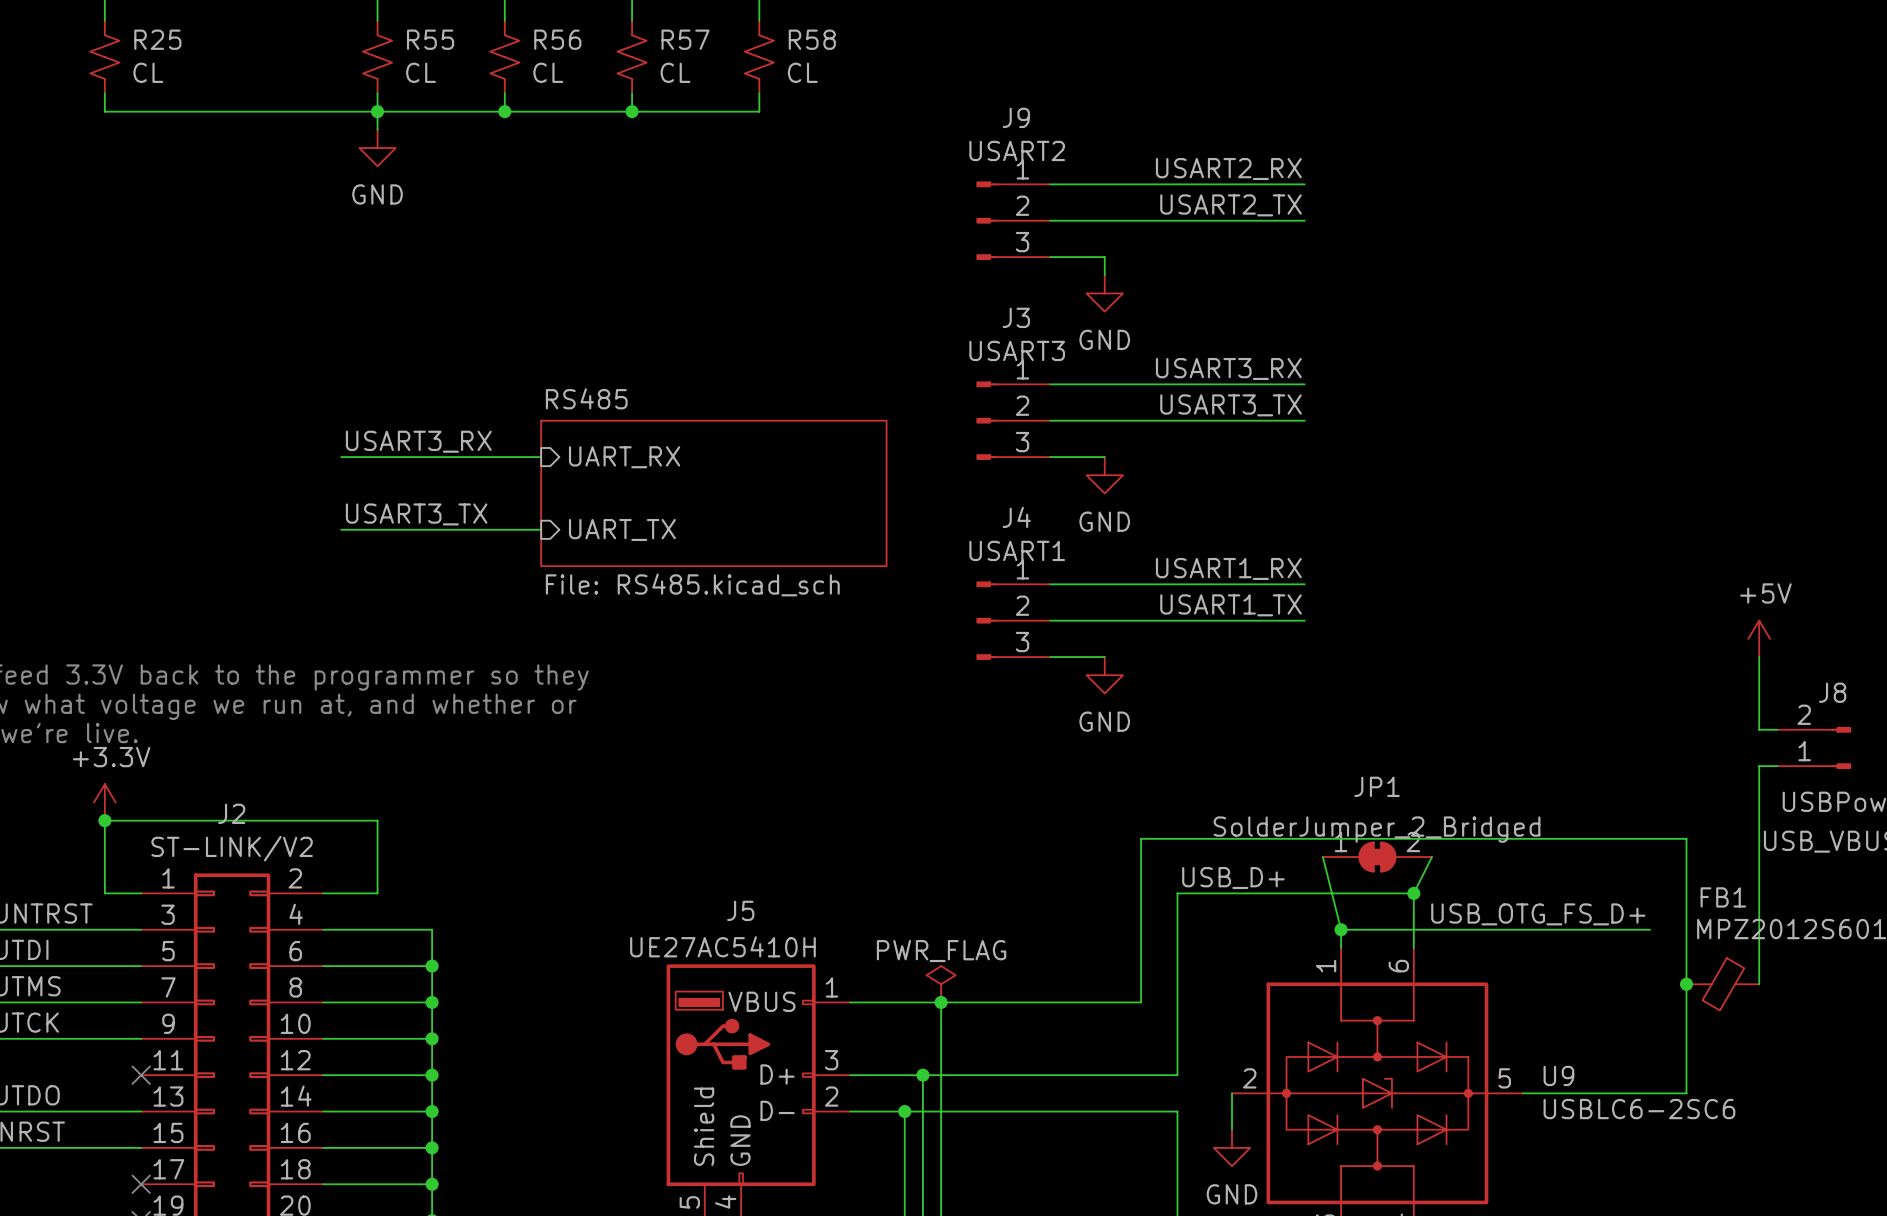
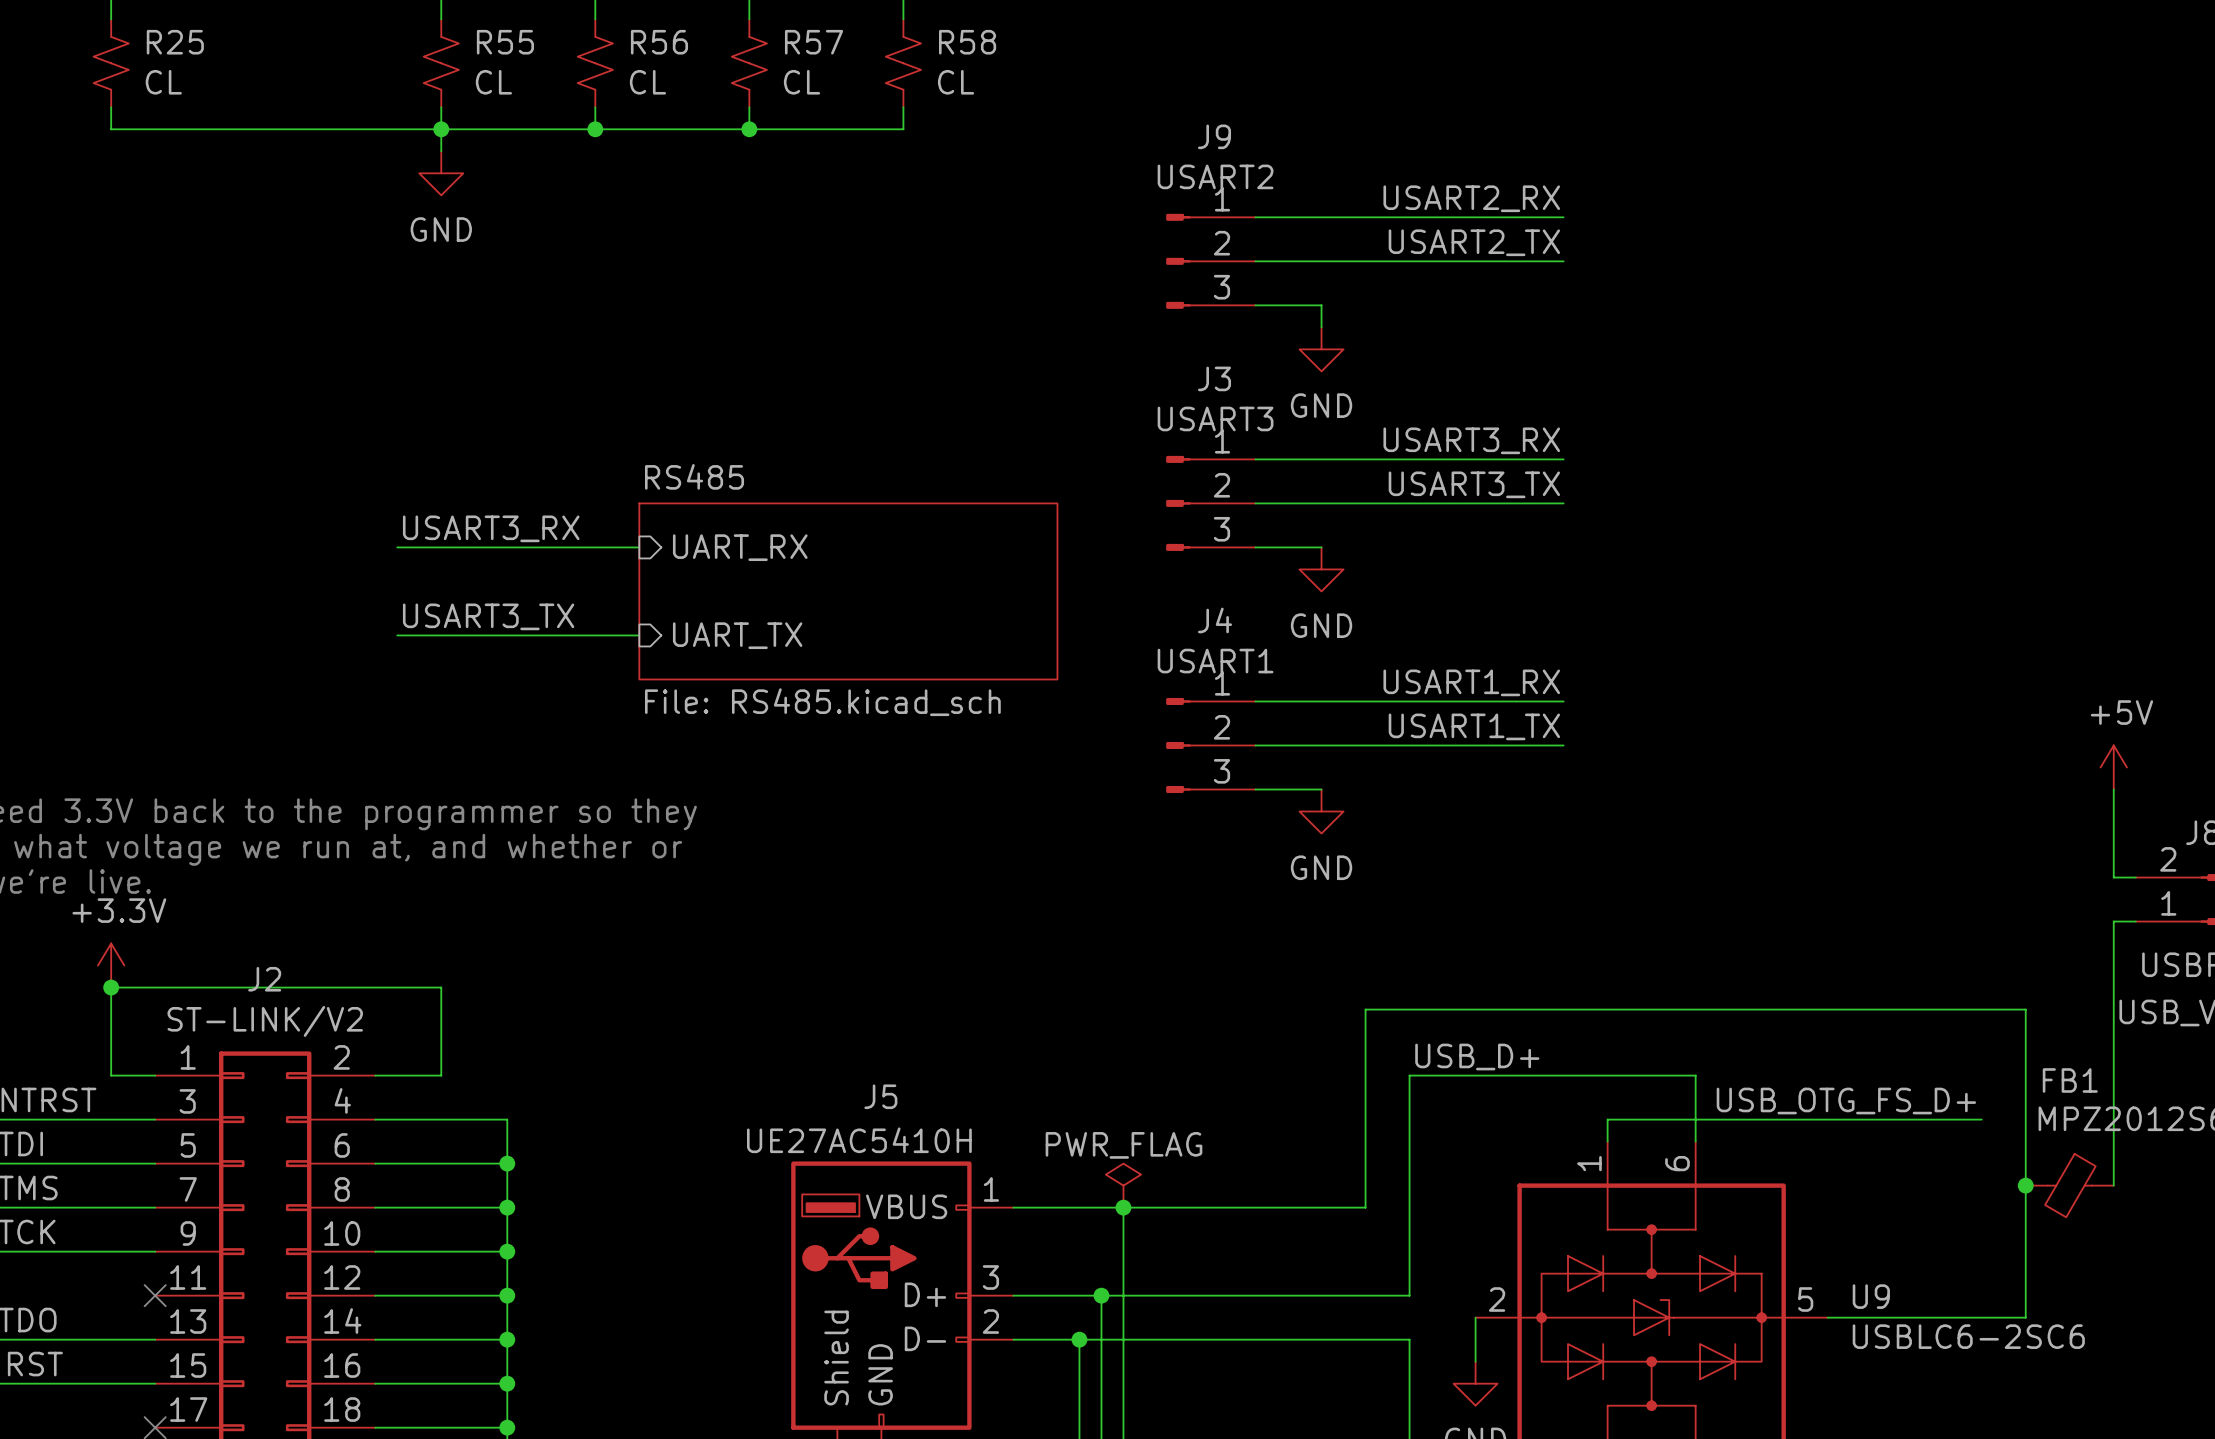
wire: (1322, 857) (1341, 929) -> none
JP1: SolderJumper_2_Bridged (1377, 857) -> none
wire: (1431, 857) (1413, 893) -> none
junction: (1413, 893) -> none
junction: (1341, 929) -> none

